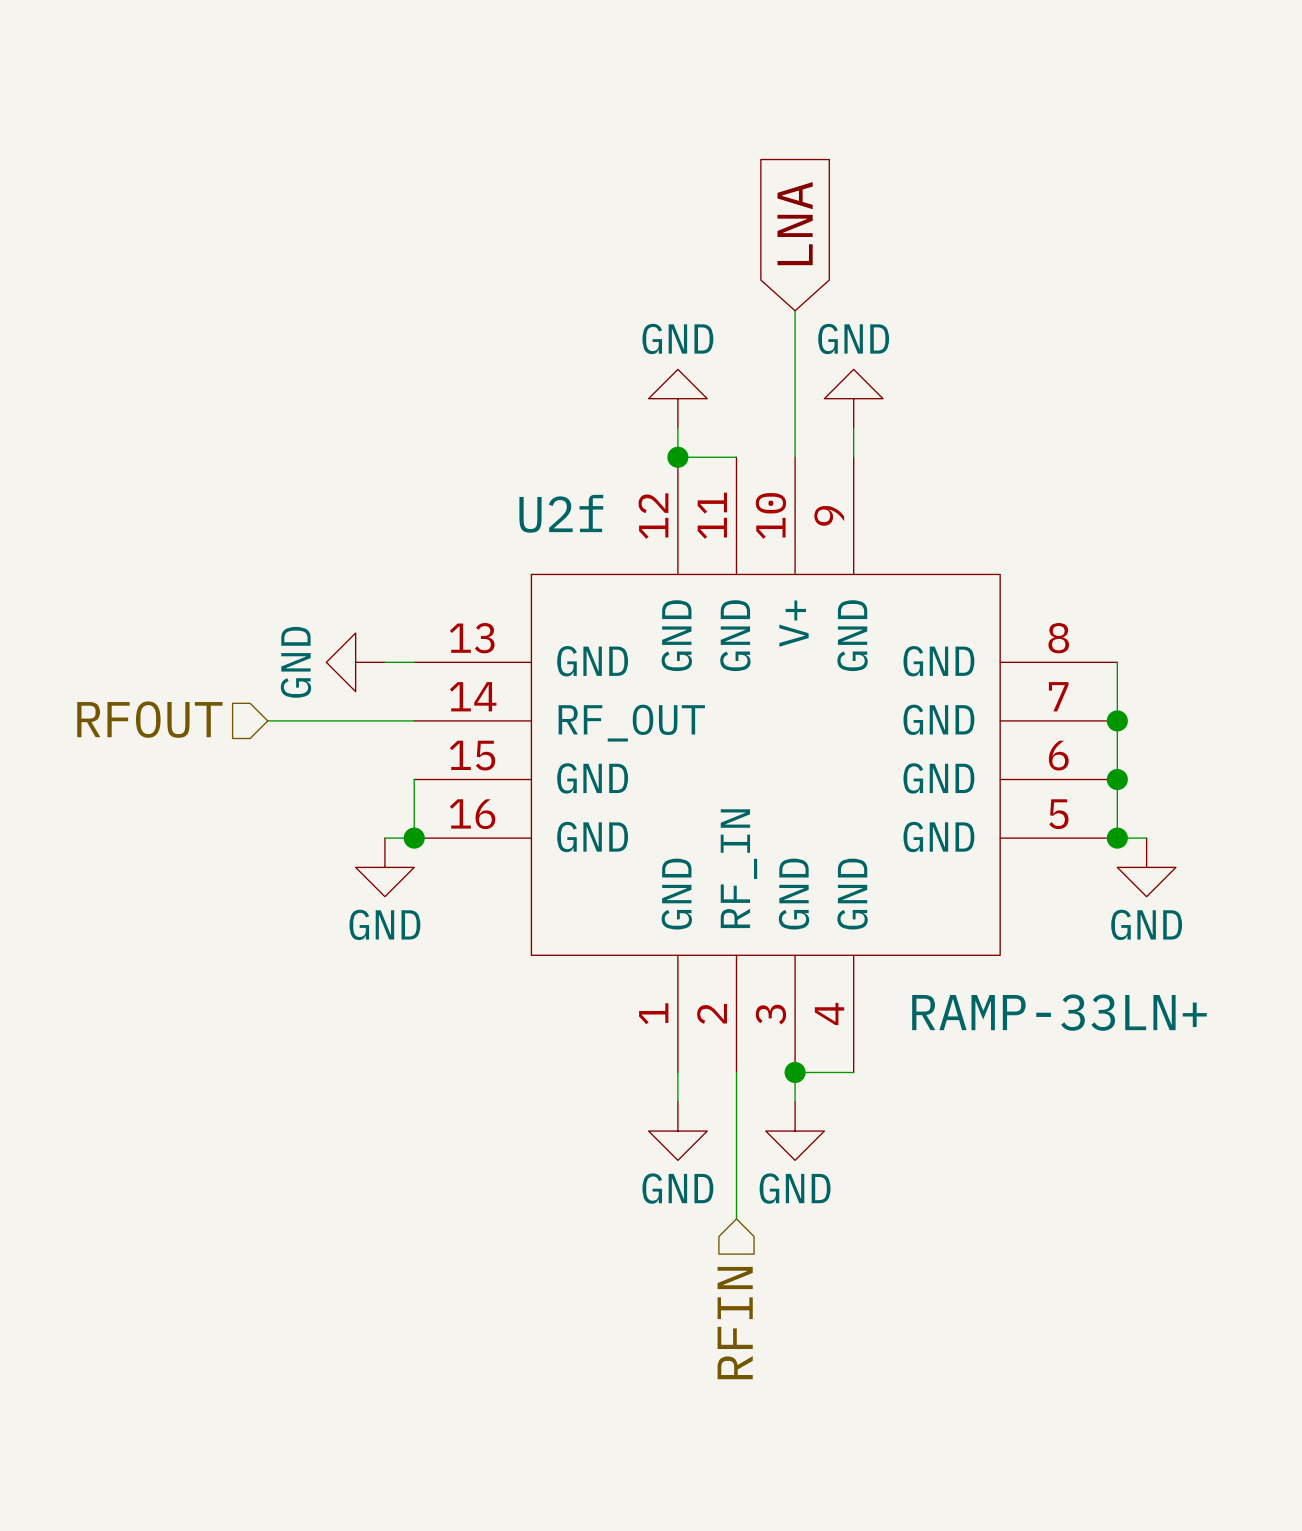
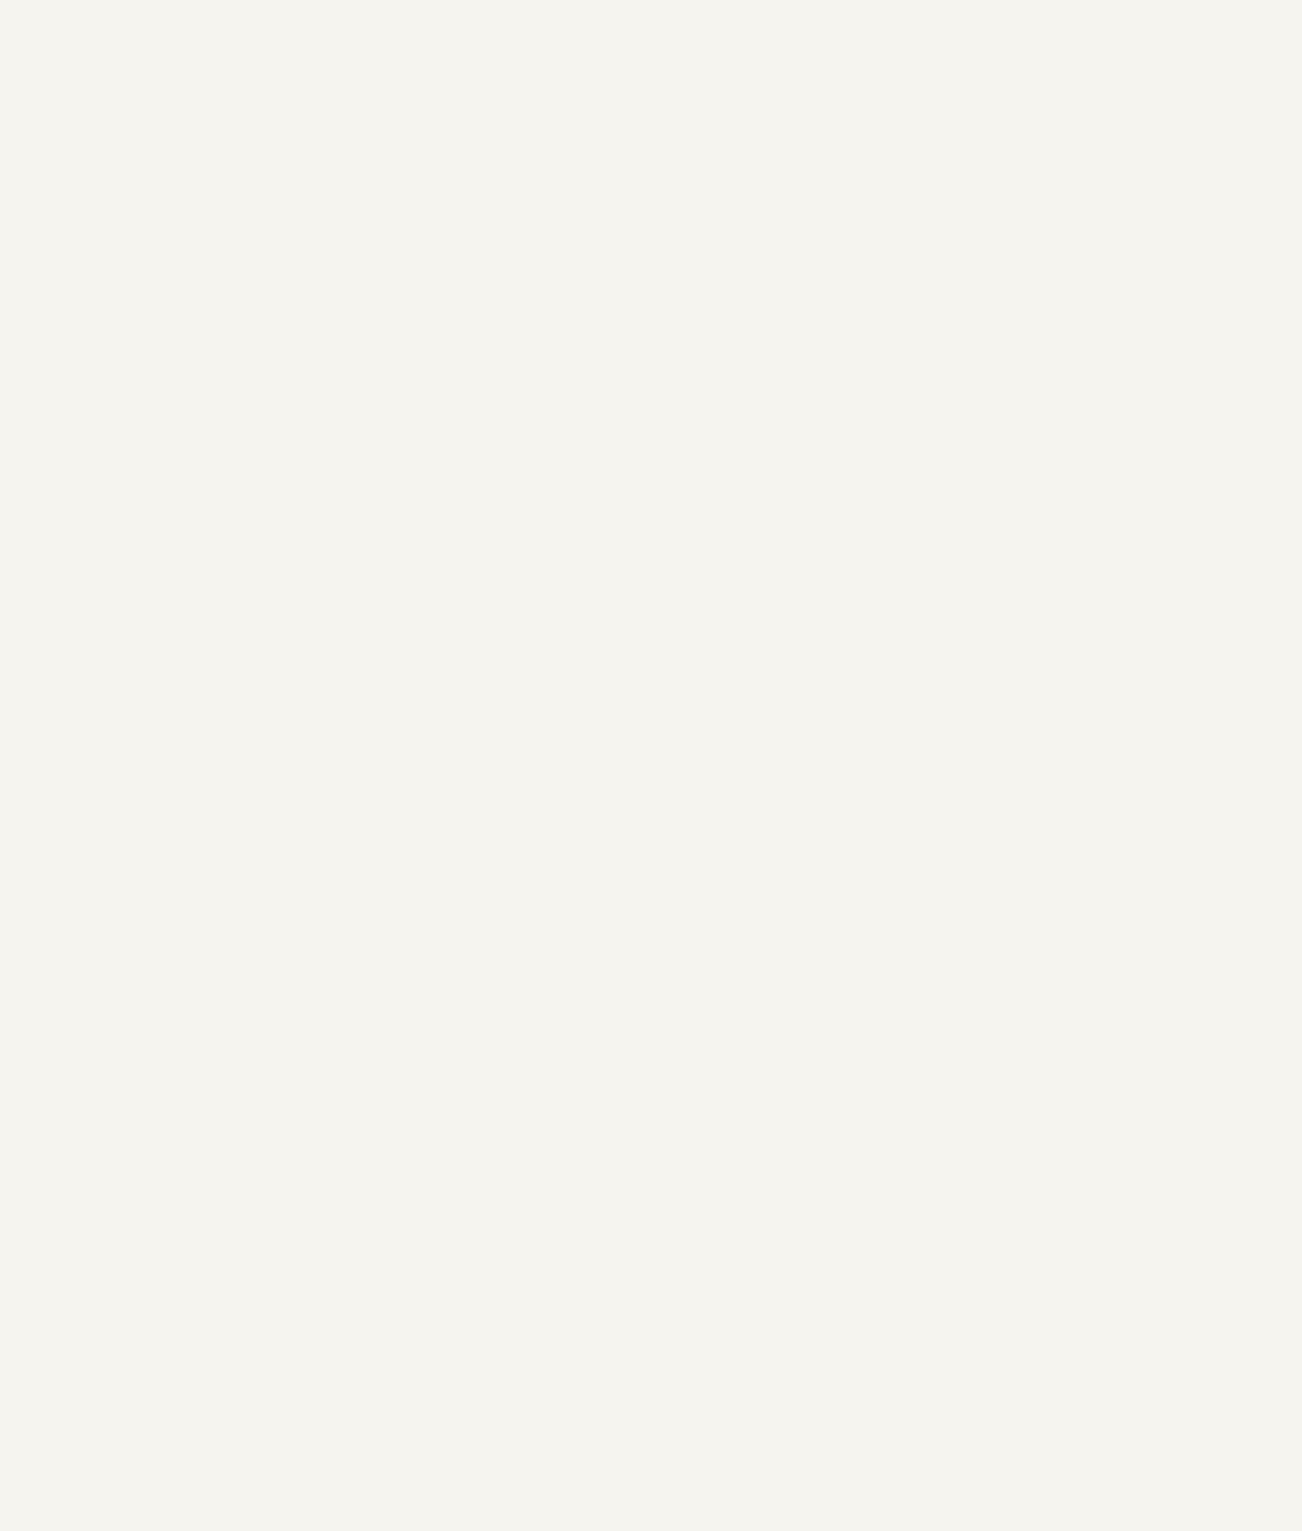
global label: LNA (795, 223) -> none
wire: (795, 310) (795, 457) -> none
power symbol: GND (677, 398) -> none
power symbol: GND (853, 398) -> none
wire: (677, 427) (677, 457) (736, 457) -> none
wire: (853, 427) (853, 457) -> none
junction: (677, 457) -> none
power symbol: GND (355, 662) -> none
wire: (384, 662) (414, 662) -> none
wire: (1117, 662) (1117, 838) (1146, 838) -> none
hierarchical label: RFOUT (149, 719) -> none
wire: (267, 720) (414, 720) -> none
junction: (1117, 720) -> none
U2f: RAMP-33LN+ (765, 764) -> none
wire: (414, 779) (414, 838) (384, 838) -> none
junction: (1117, 779) -> none
junction: (414, 838) -> none
junction: (1117, 838) -> none
power symbol: GND (384, 867) -> none
power symbol: GND (1146, 867) -> none
wire: (677, 1072) (677, 1101) -> none
wire: (736, 1072) (736, 1218) -> none
junction: (795, 1072) -> none
wire: (853, 1072) (795, 1072) (795, 1101) -> none
power symbol: GND (677, 1131) -> none
power symbol: GND (795, 1131) -> none
hierarchical label: RFIN (735, 1323) -> none

